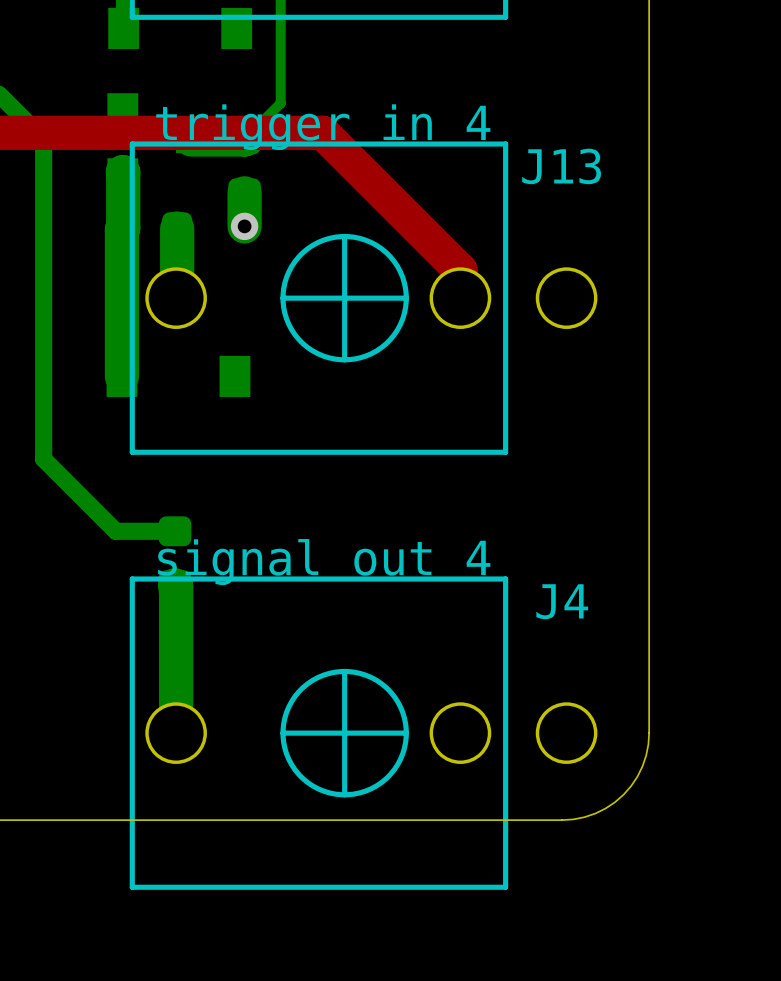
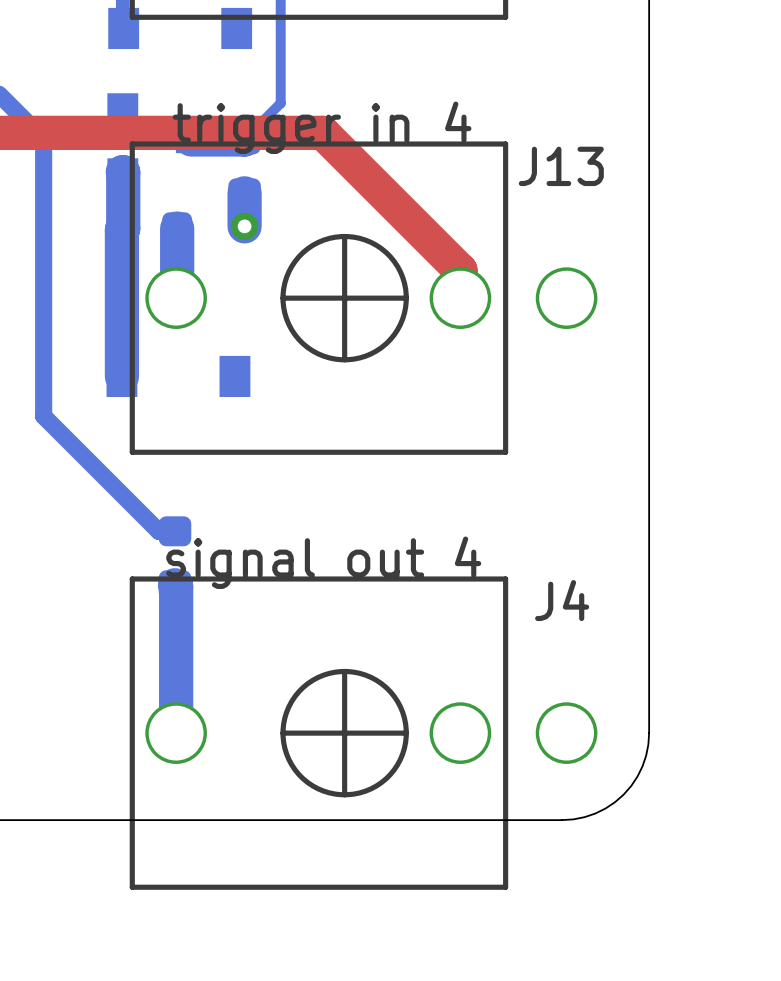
bottom track: (43, 416) (43, 459) (115, 531) (158, 531) -> (43, 416) (158, 531)

